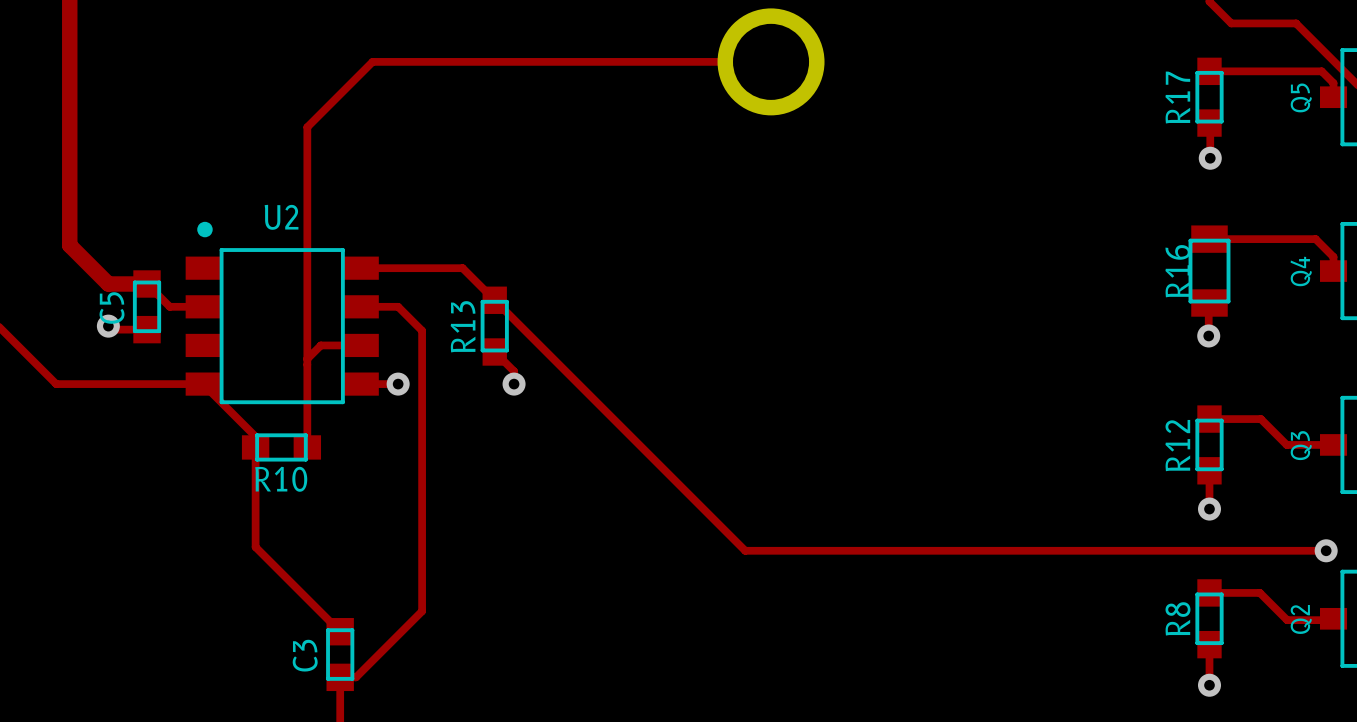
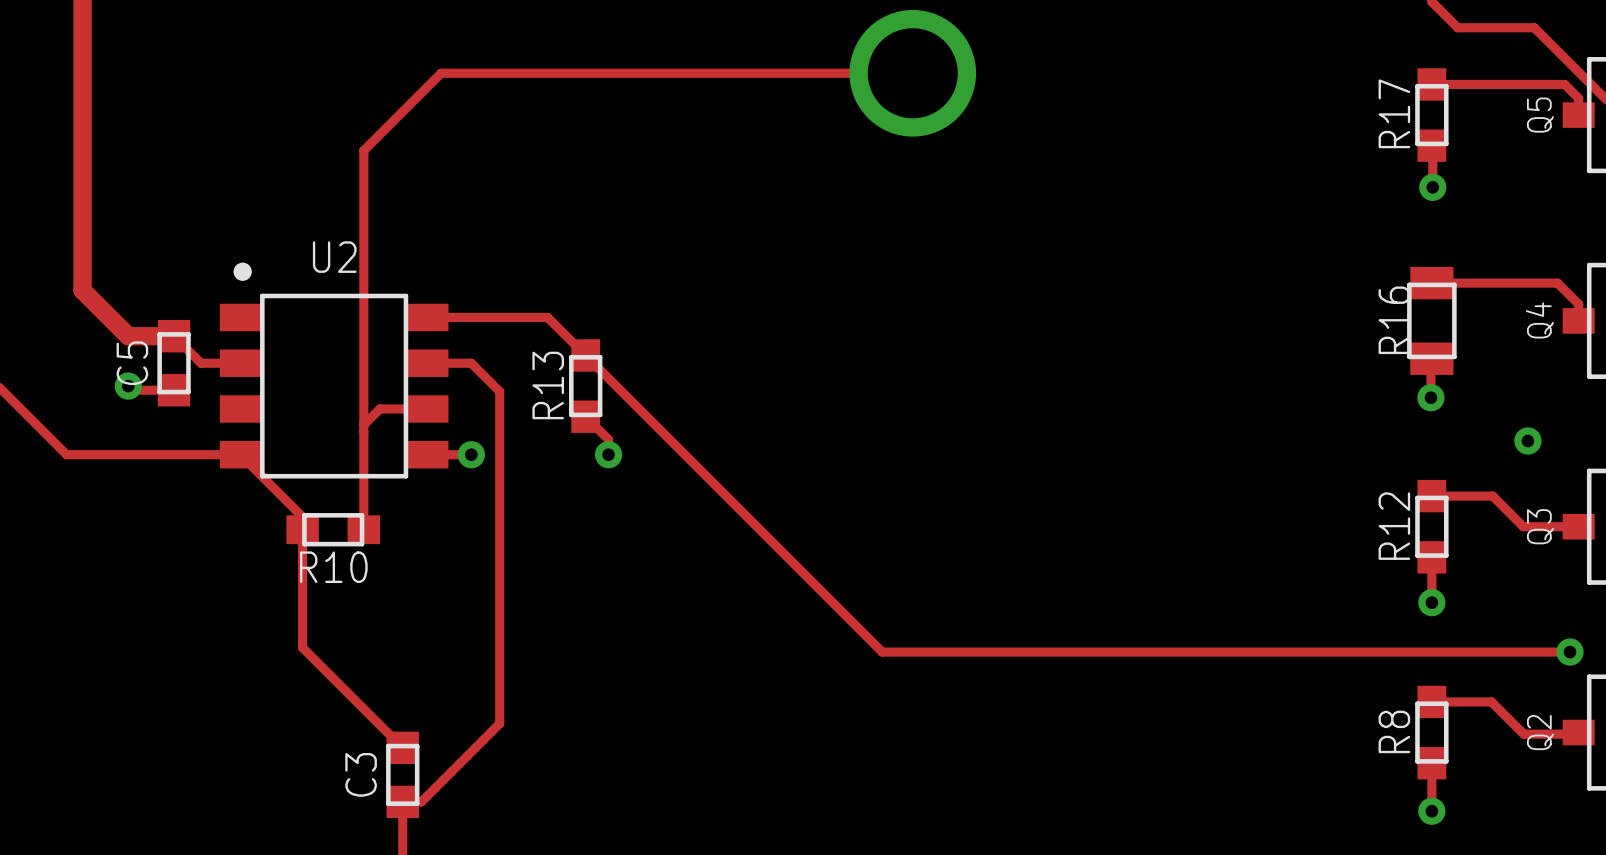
via: none -> (1527, 440)

